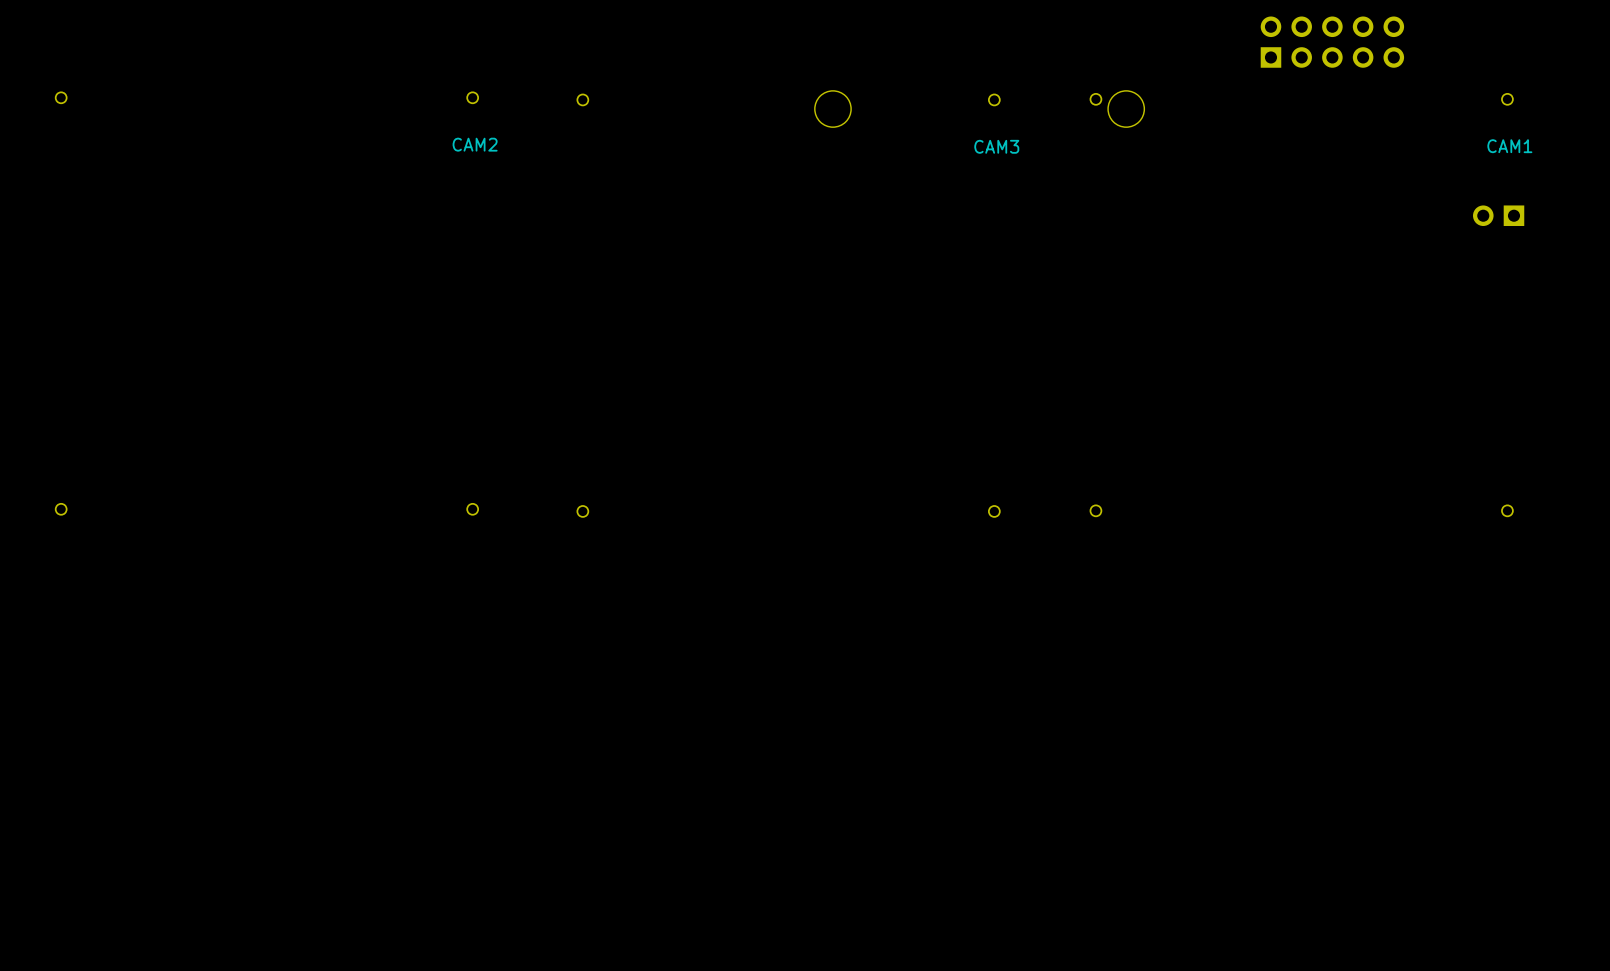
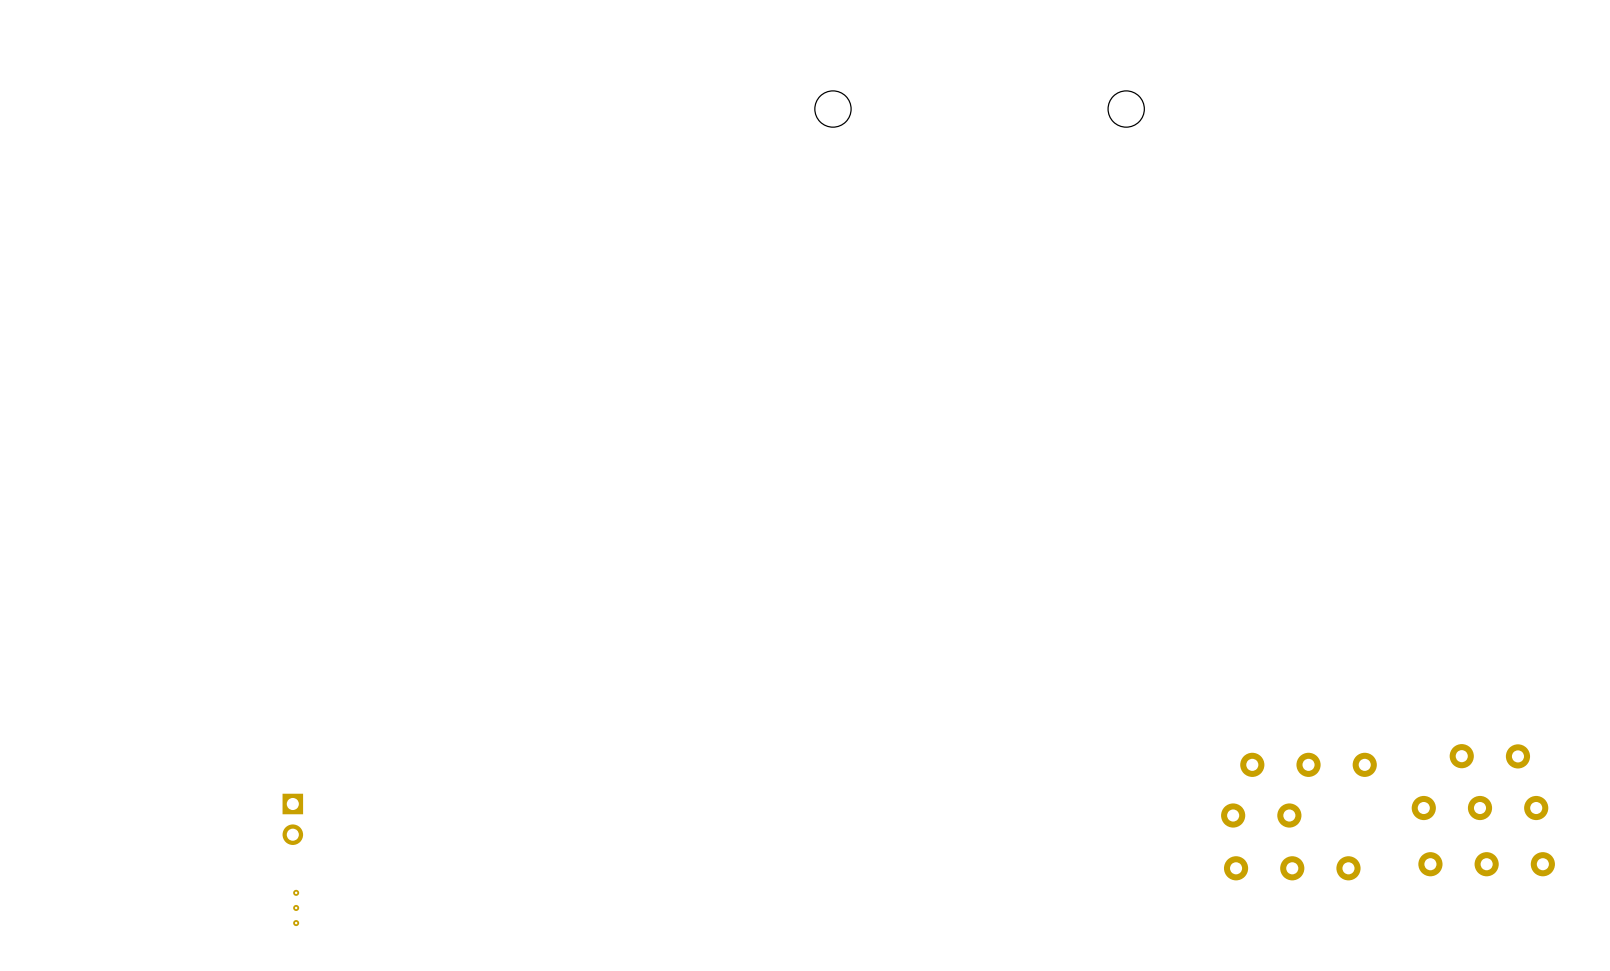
part: (1332, 42) -> none
part: (1498, 215) -> none
CAM2: (266, 303) -> none
CAM3: (788, 305) -> none
CAM1: (1301, 305) -> none
part: none -> (1461, 756)
part: none -> (1517, 756)
part: none -> (1252, 764)
part: none -> (1308, 764)
part: none -> (1364, 764)
part: none -> (1423, 808)
part: none -> (1480, 808)
part: none -> (1536, 808)
part: none -> (1233, 815)
part: none -> (1289, 815)
part: none -> (292, 819)
part: none -> (1430, 864)
part: none -> (1486, 864)
part: none -> (1542, 864)
part: none -> (1236, 868)
part: none -> (1292, 868)
part: none -> (1348, 868)
part: none -> (296, 907)

